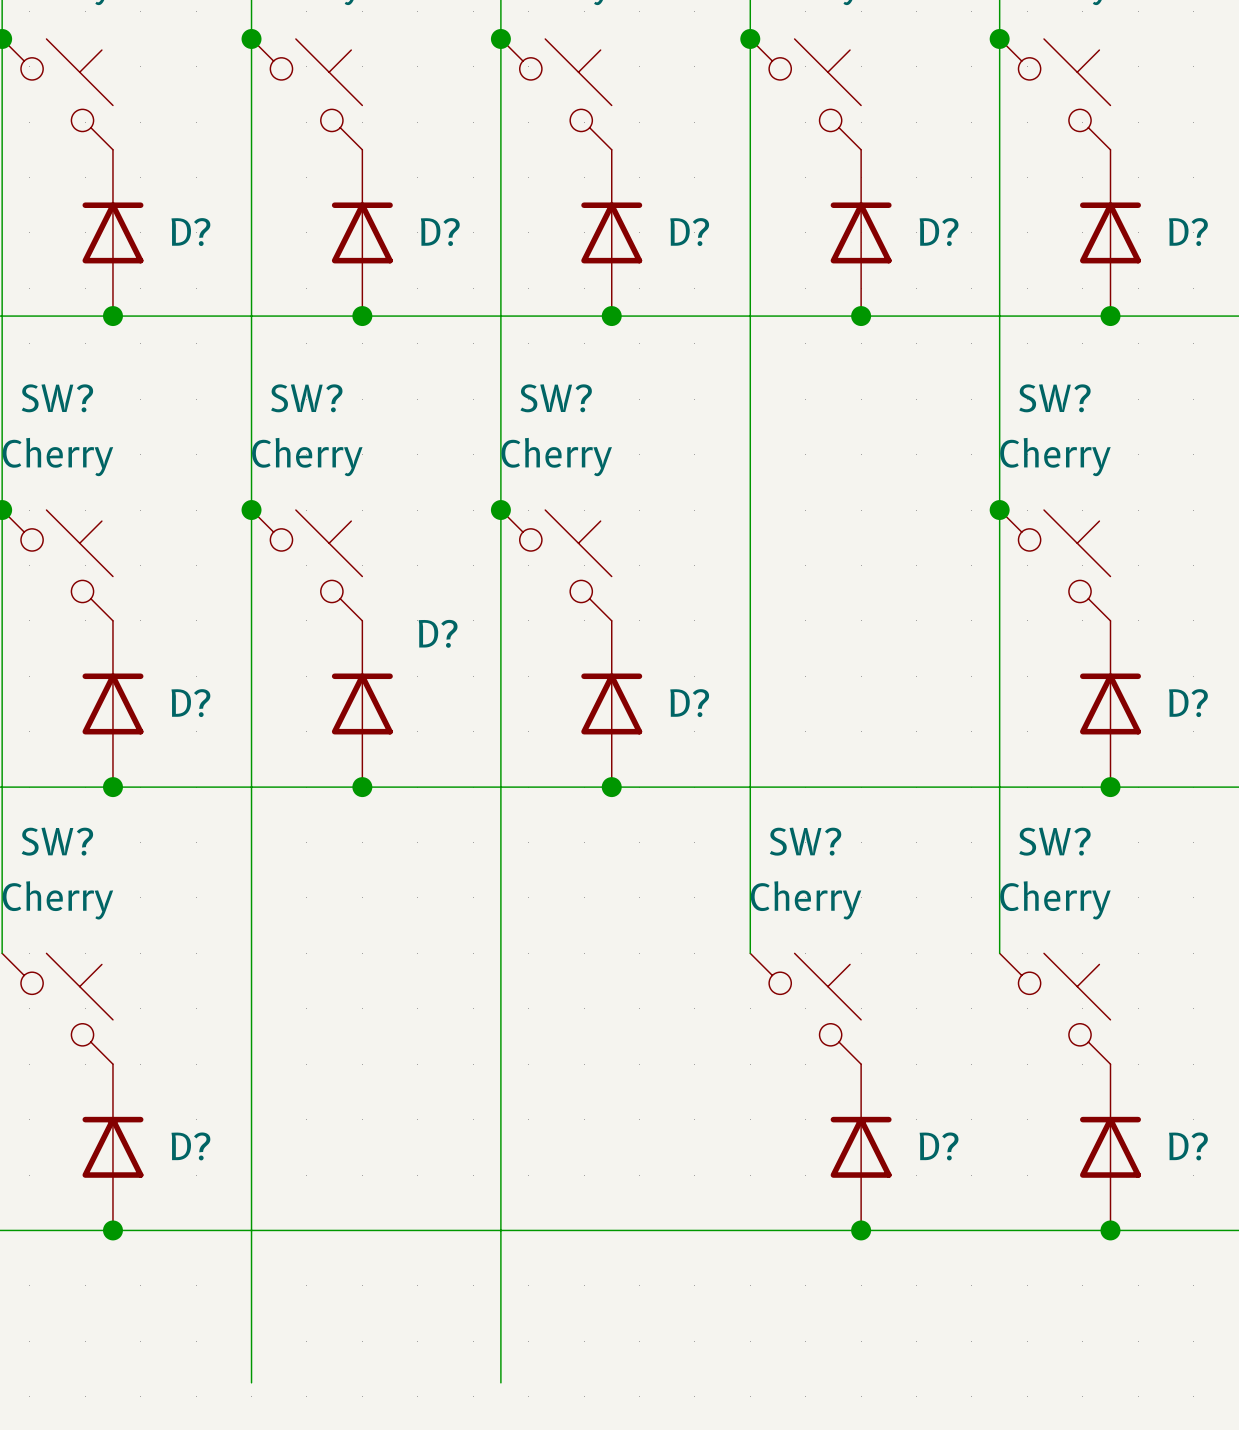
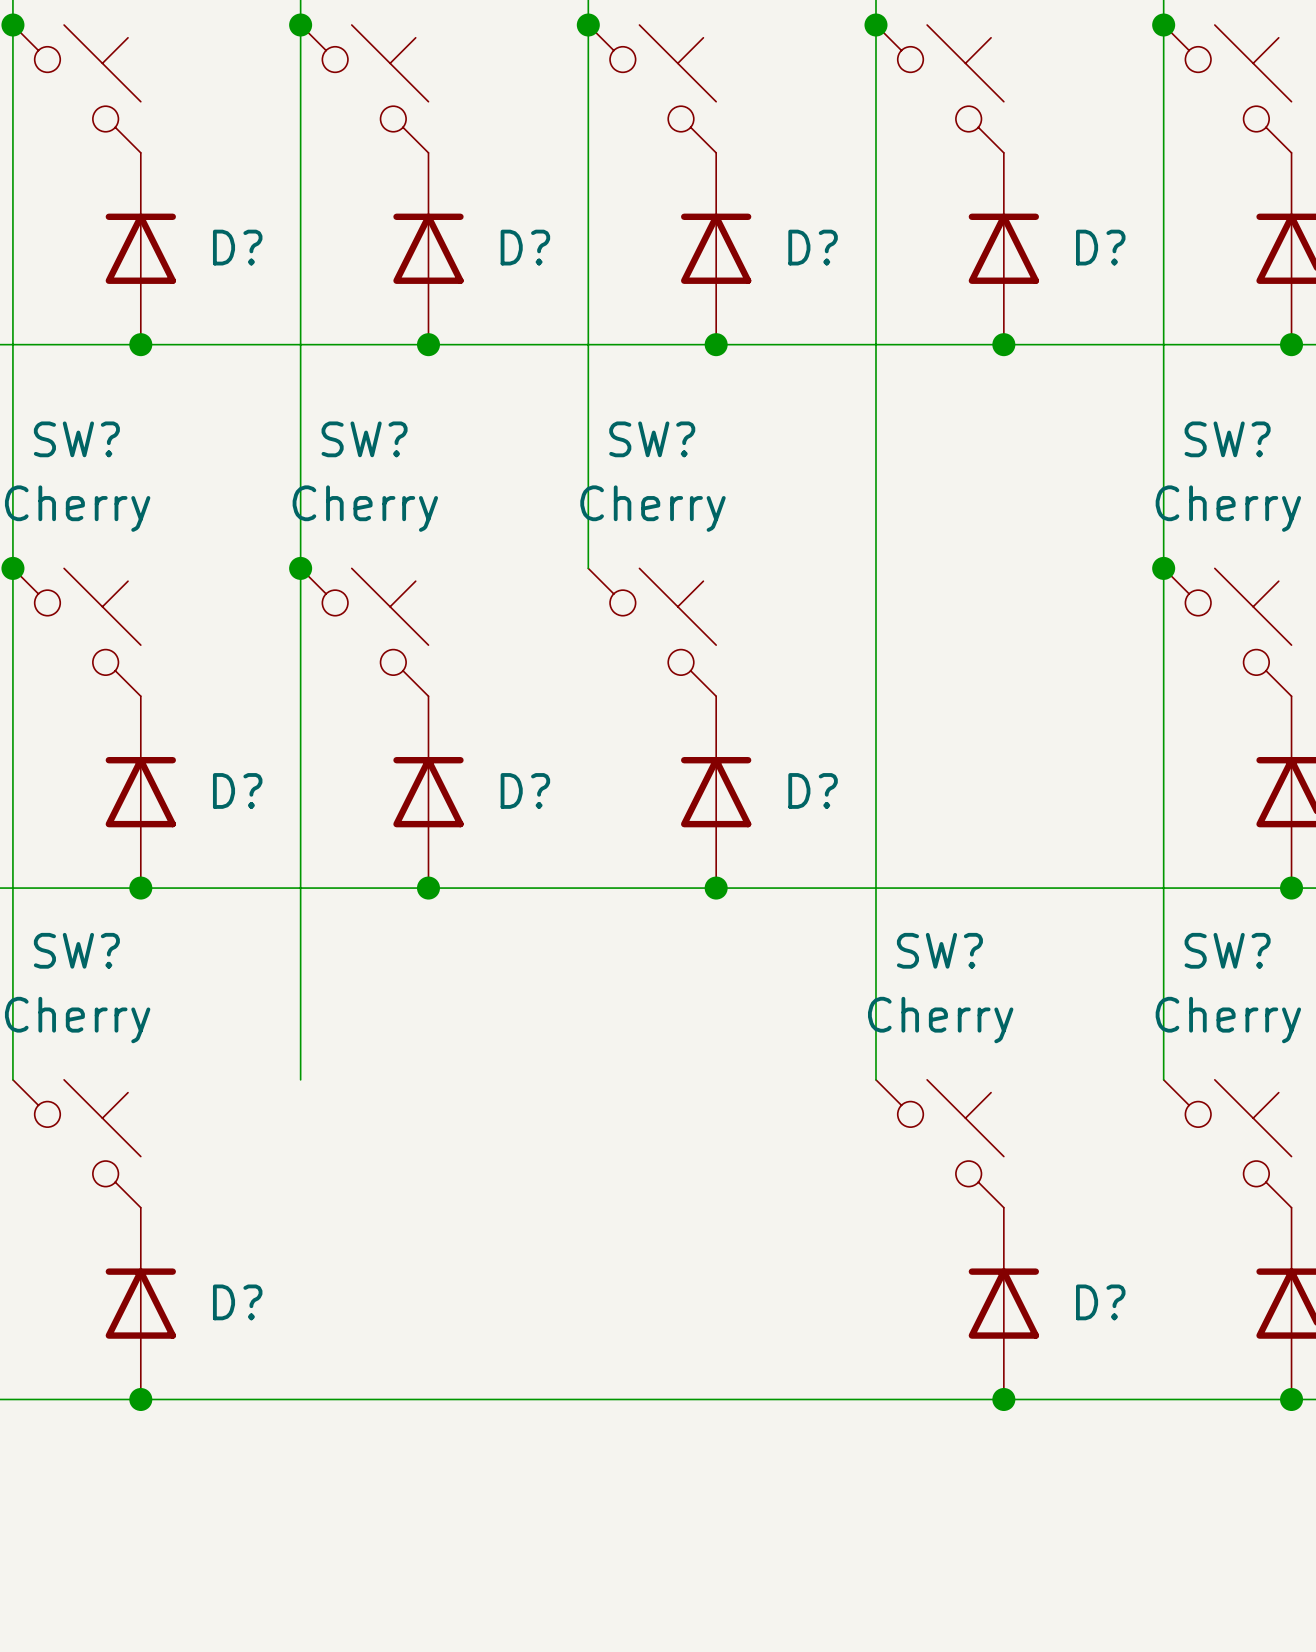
wire: (500, 510) (500, 1382) -> none
junction: (500, 510) -> none
D? name position: D? (438, 633) -> D? (525, 790)
wire: (251, 953) (251, 1382) -> none

